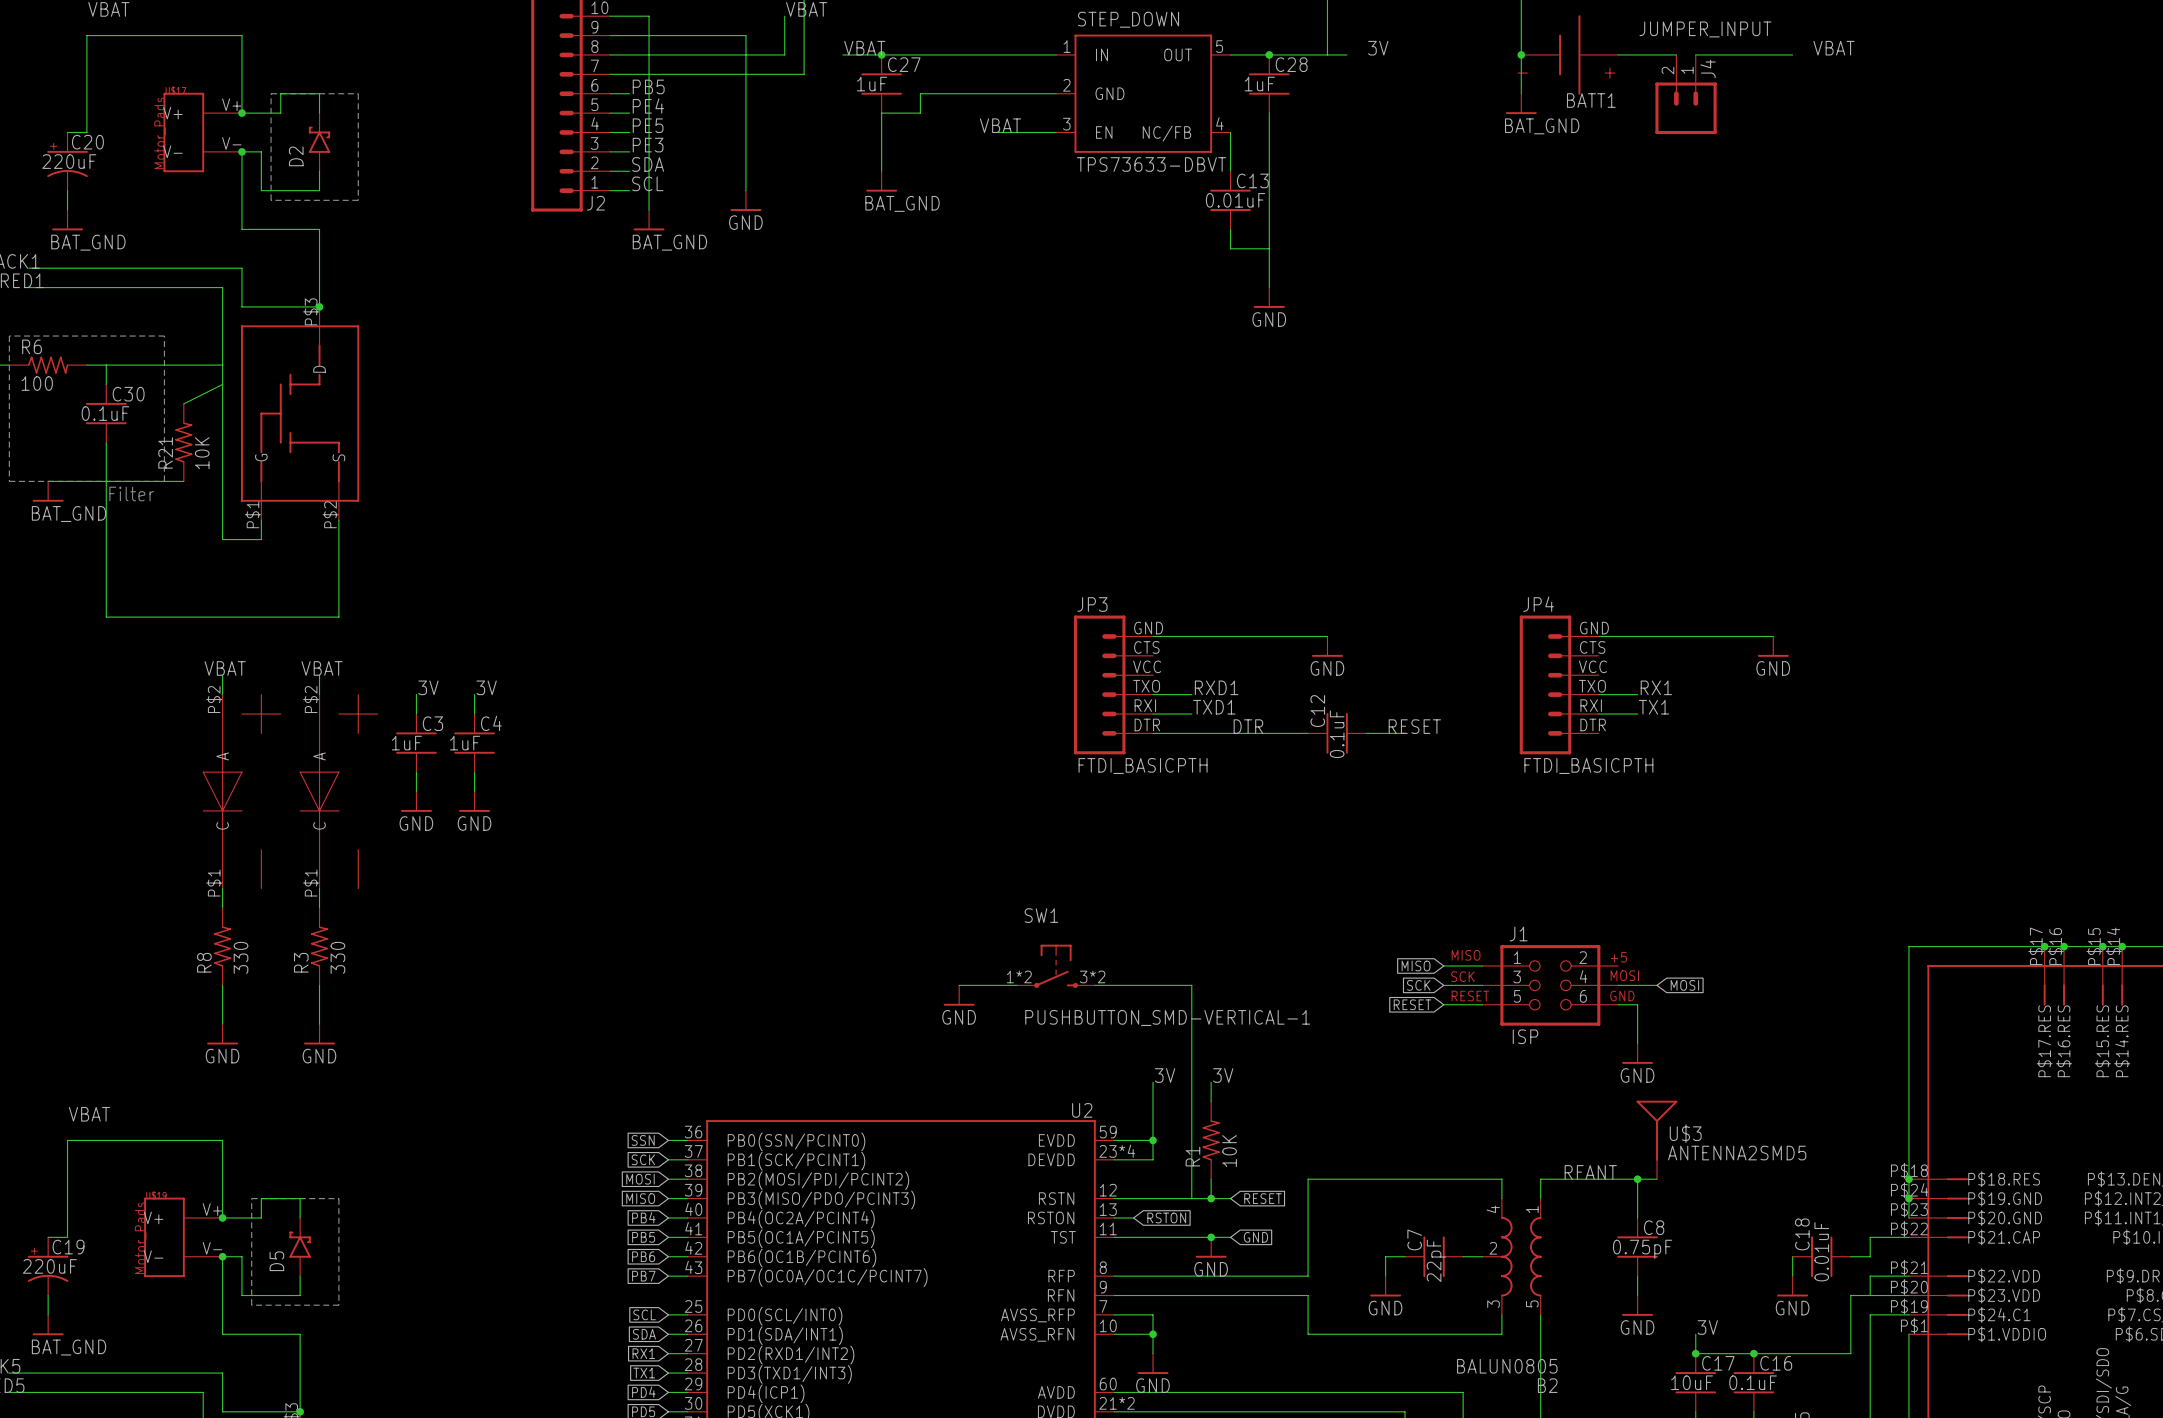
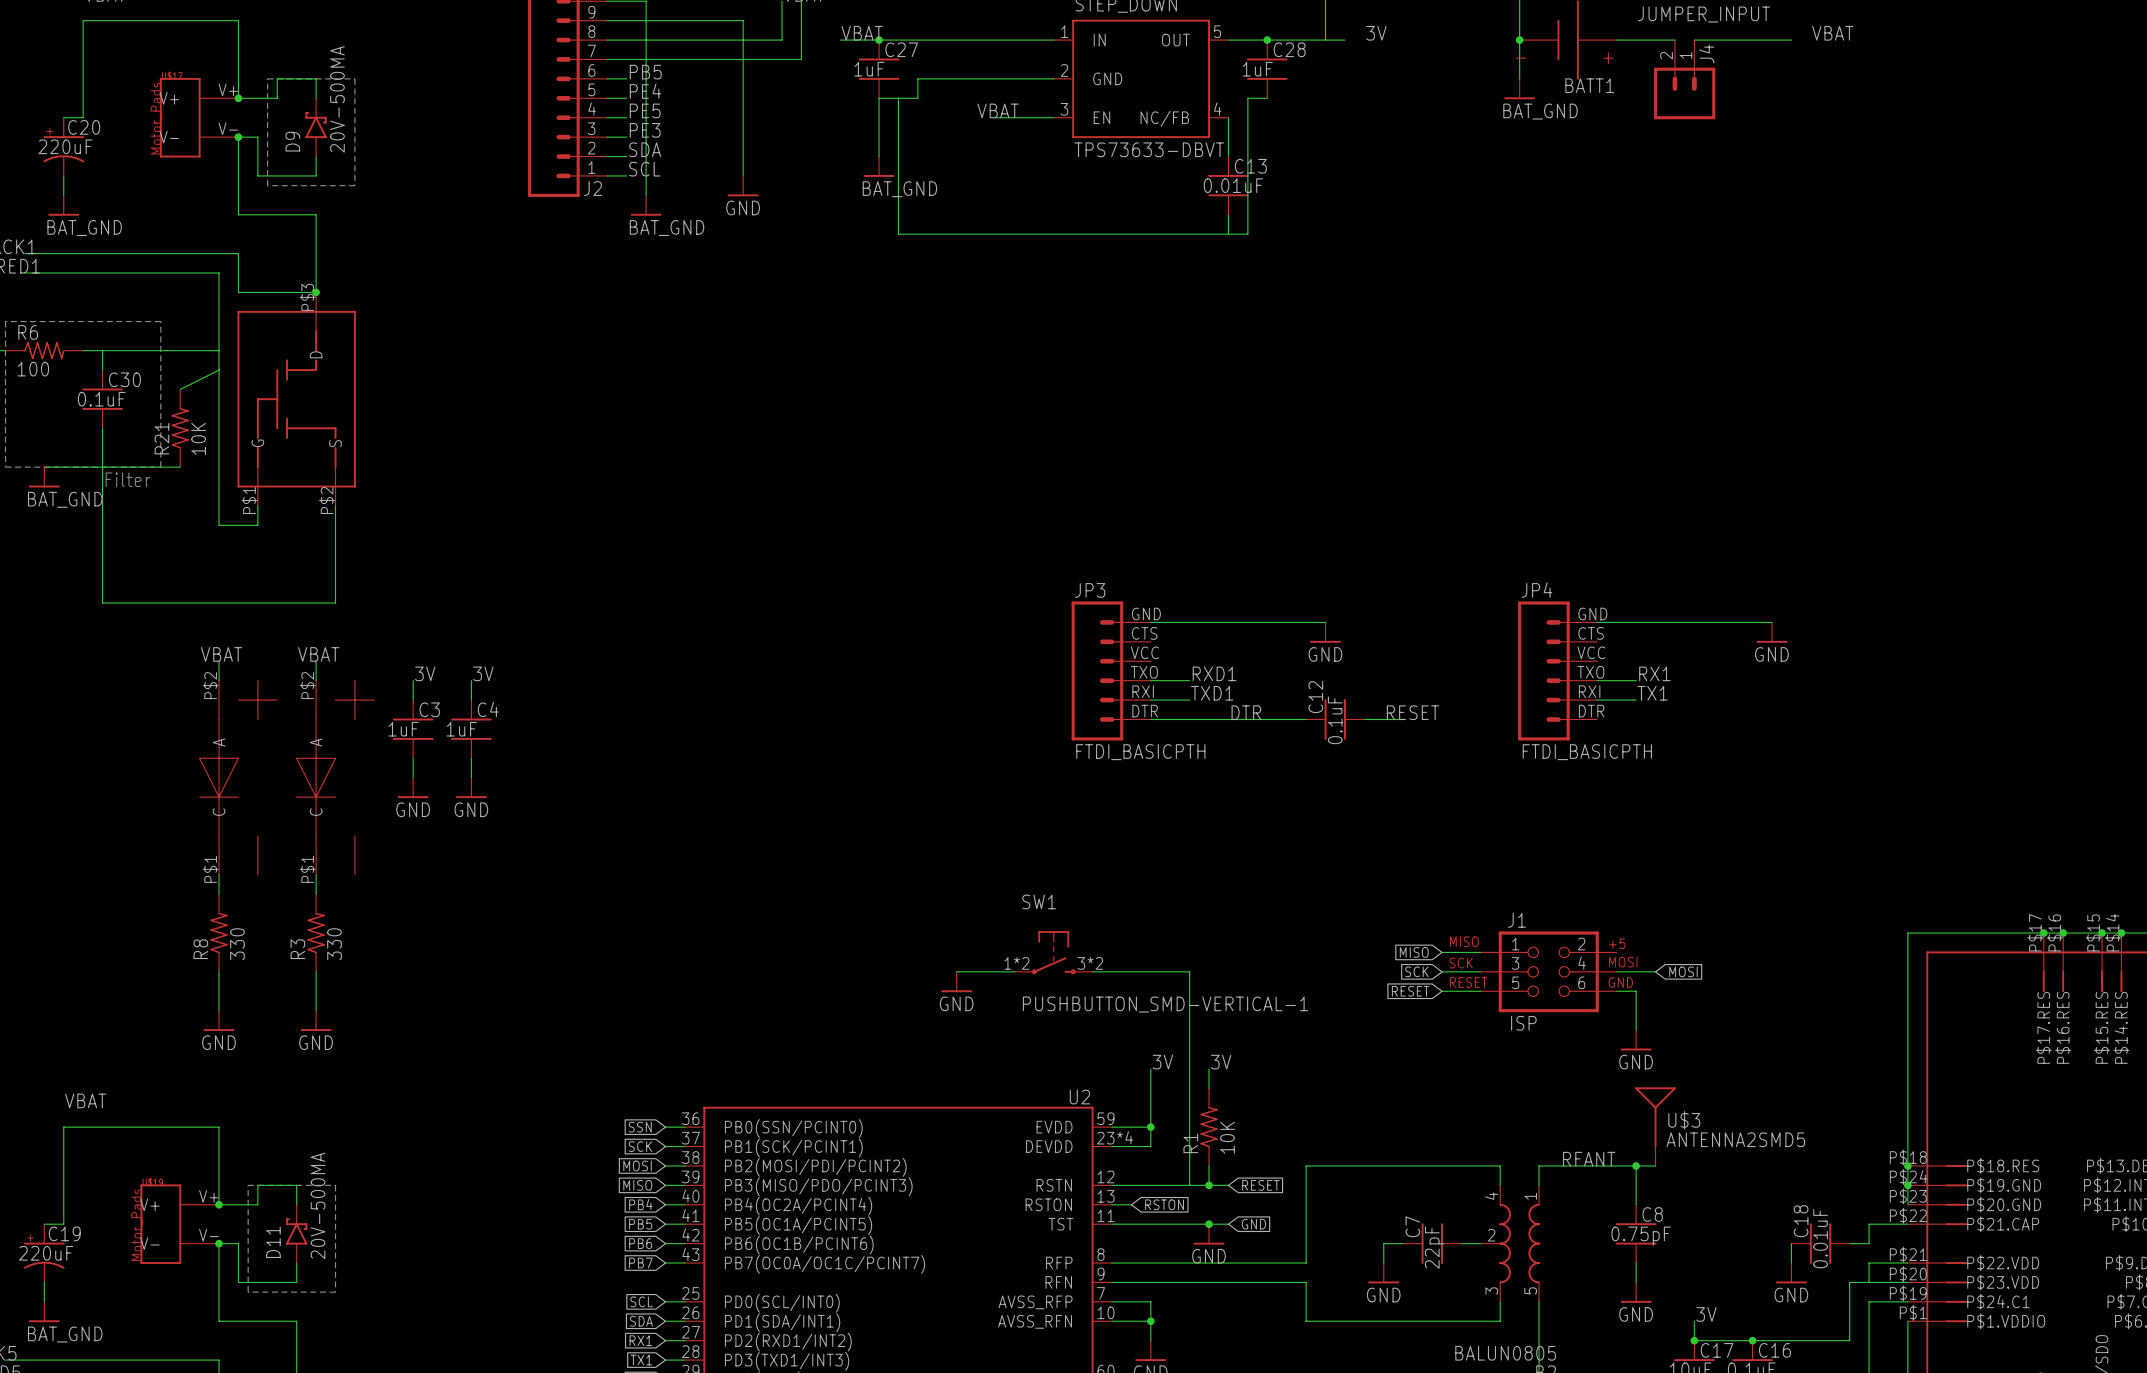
wire: none -> (898, 98) (898, 234) (1228, 234)
wire: (1269, 113) (1269, 287) -> (1267, 98) (1247, 98) (1247, 234)
D2 value: none -> 20V-500MA (337, 99)
D2 name: D2 (296, 156) -> D9 (292, 141)
wire: (1249, 248) (1269, 248) -> none
power symbol: GND (1269, 297) -> none
D5 value: none -> 20V-500MA (318, 1205)
D5 name: D5 (276, 1261) -> D11 (273, 1242)

